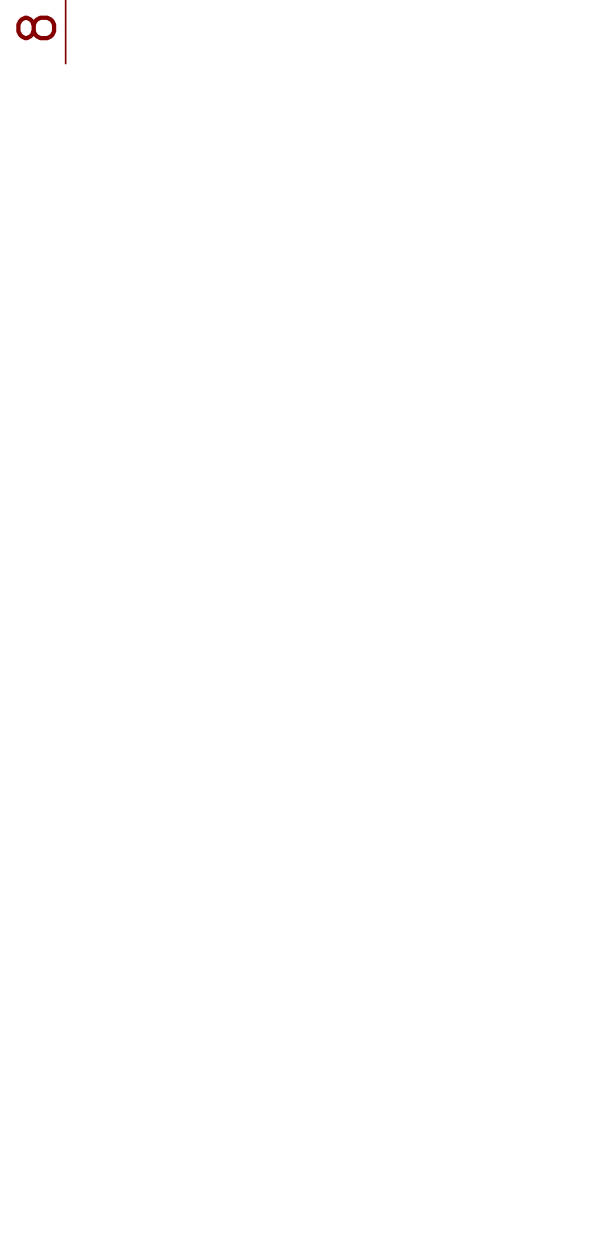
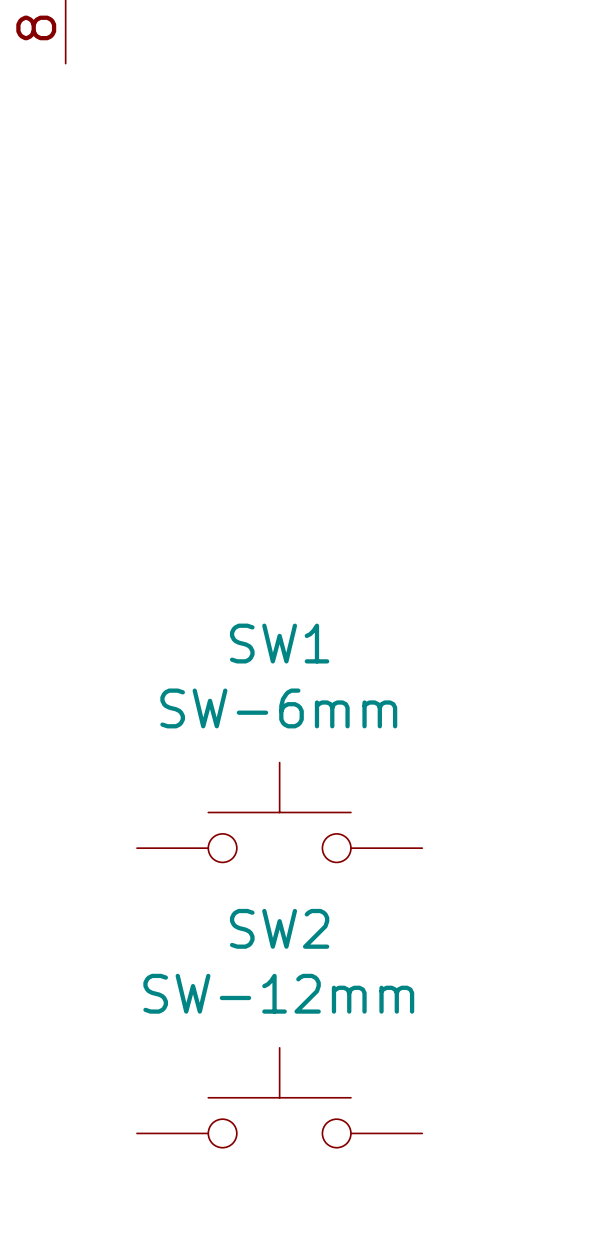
SW1: none -> SW-6mm (279, 812)
SW2: none -> SW-12mm (279, 1097)

